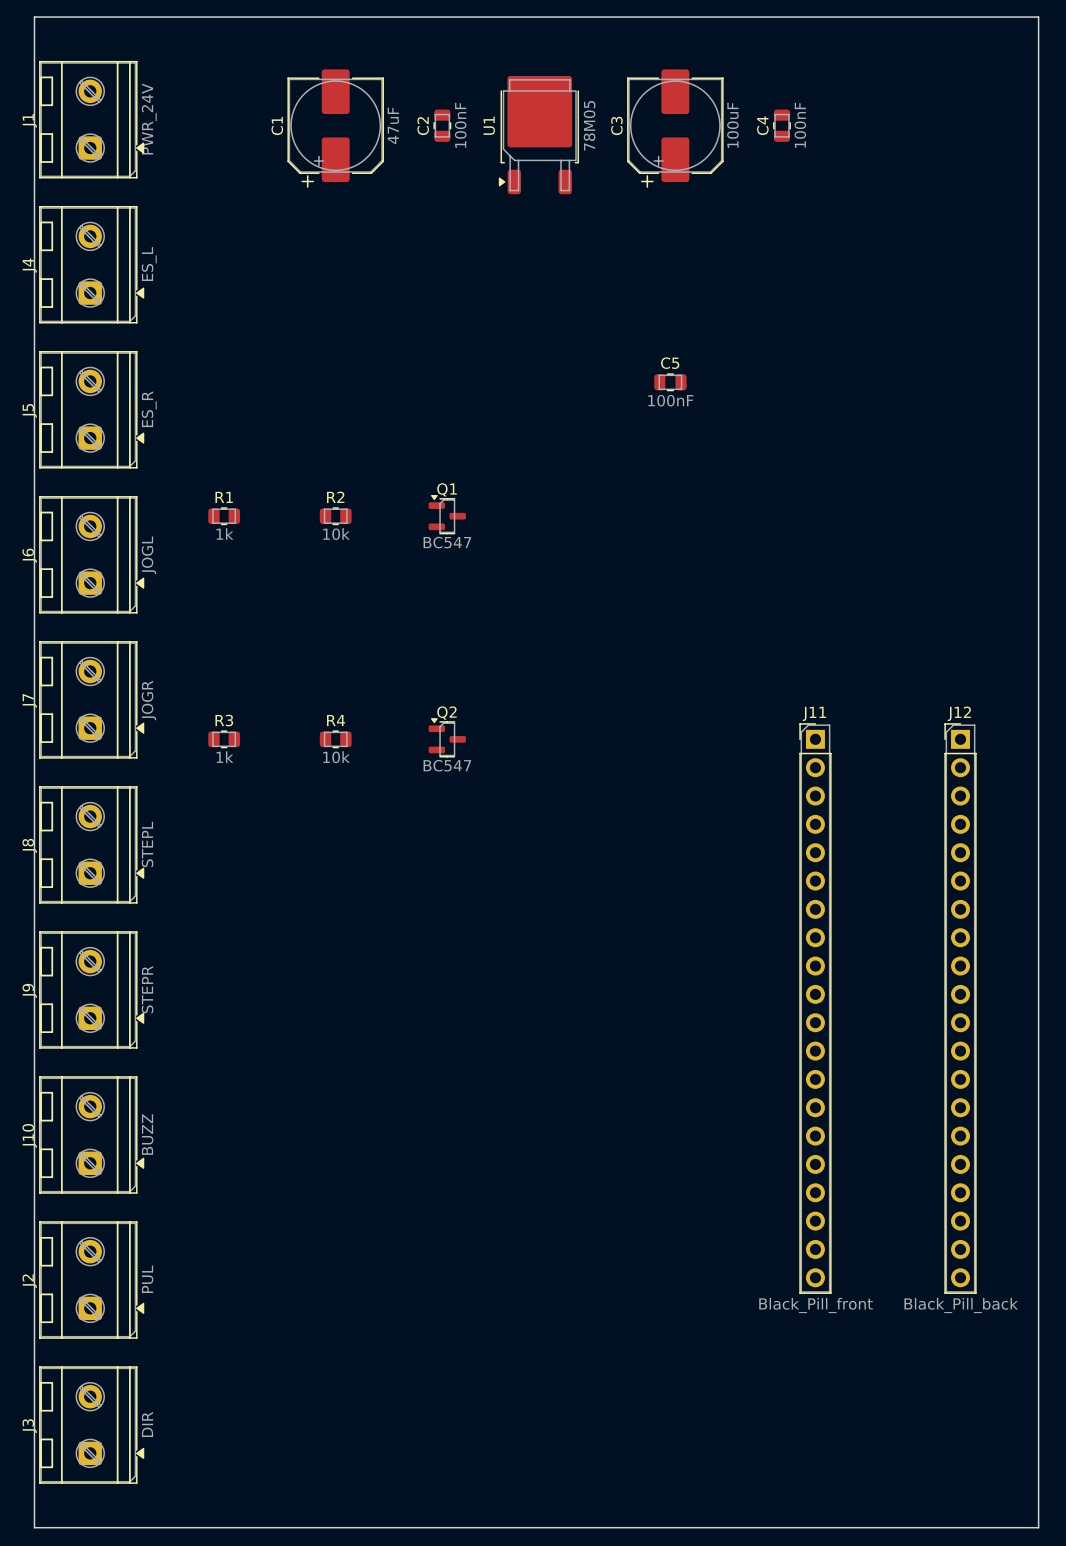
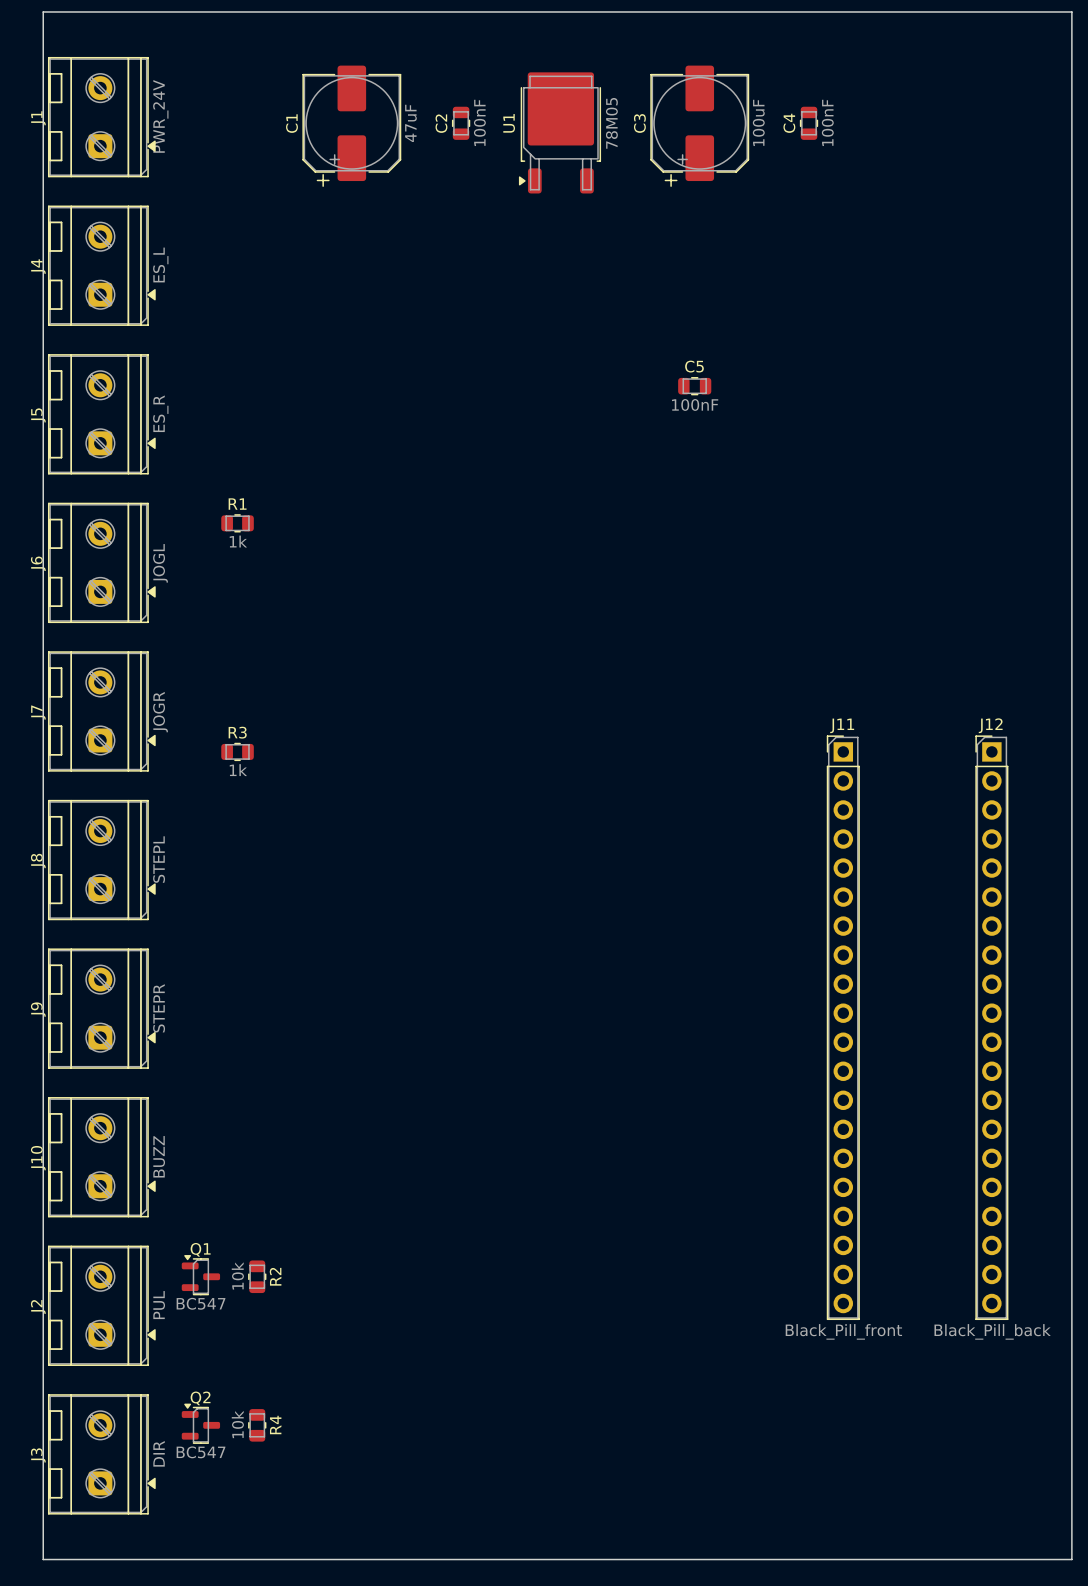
Q1 position: (447, 514) -> (200, 1275)
R2 rotation: 0° (335, 516) -> 90° clockwise (257, 1276)
R2 position: (335, 516) -> (257, 1276)
Q2 position: (447, 737) -> (200, 1423)
R4 rotation: 0° (335, 739) -> 90° clockwise (257, 1425)
R4 position: (335, 739) -> (257, 1425)

